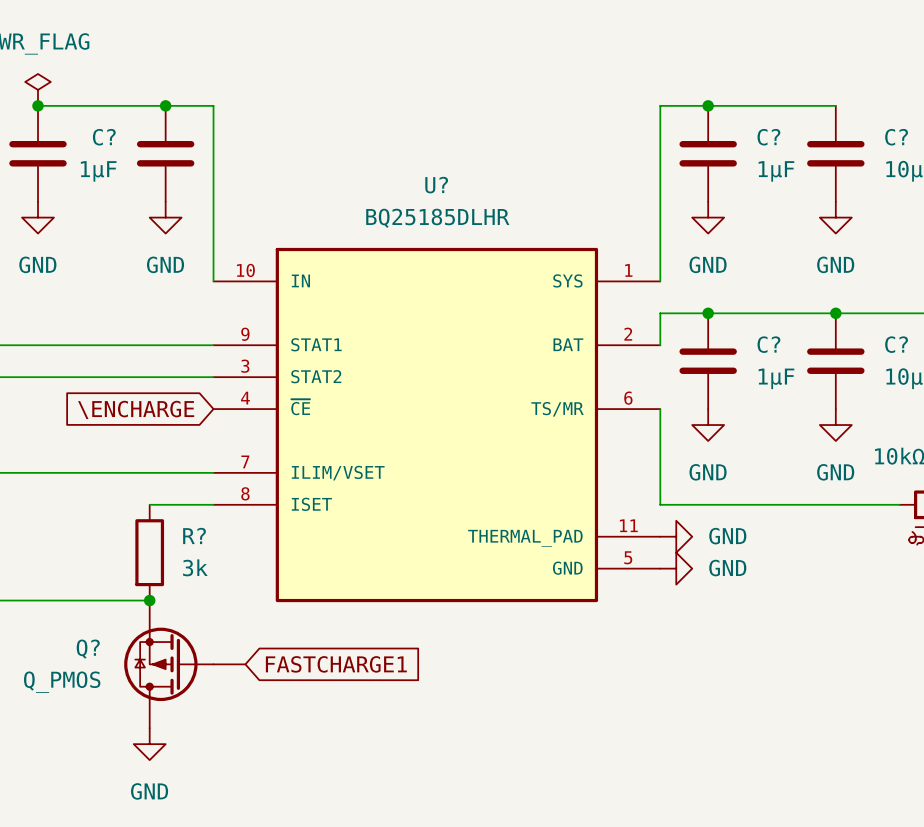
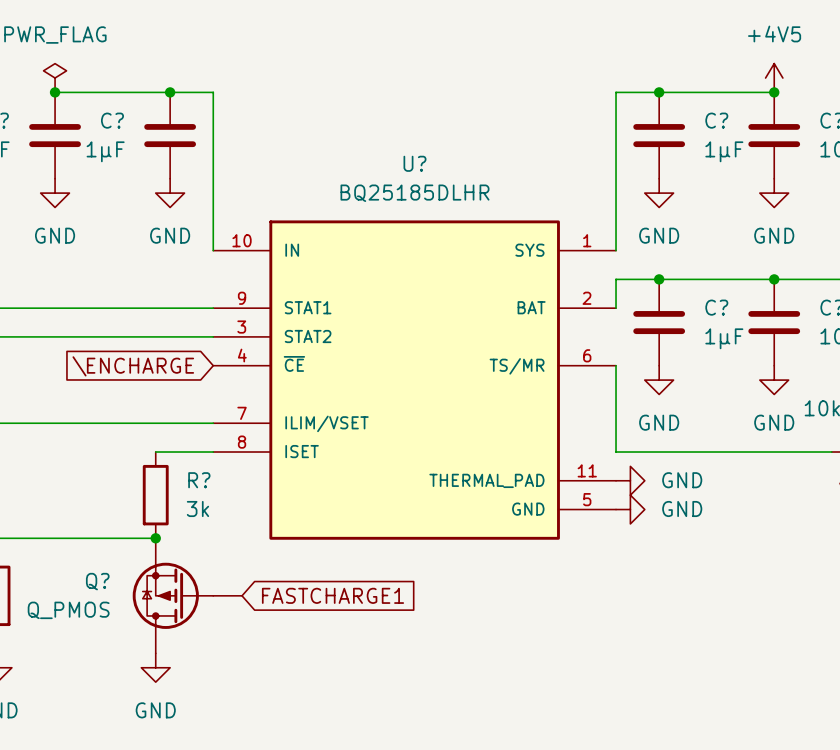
power symbol: none -> +4V5 (774, 78)
junction: none -> (774, 92)

